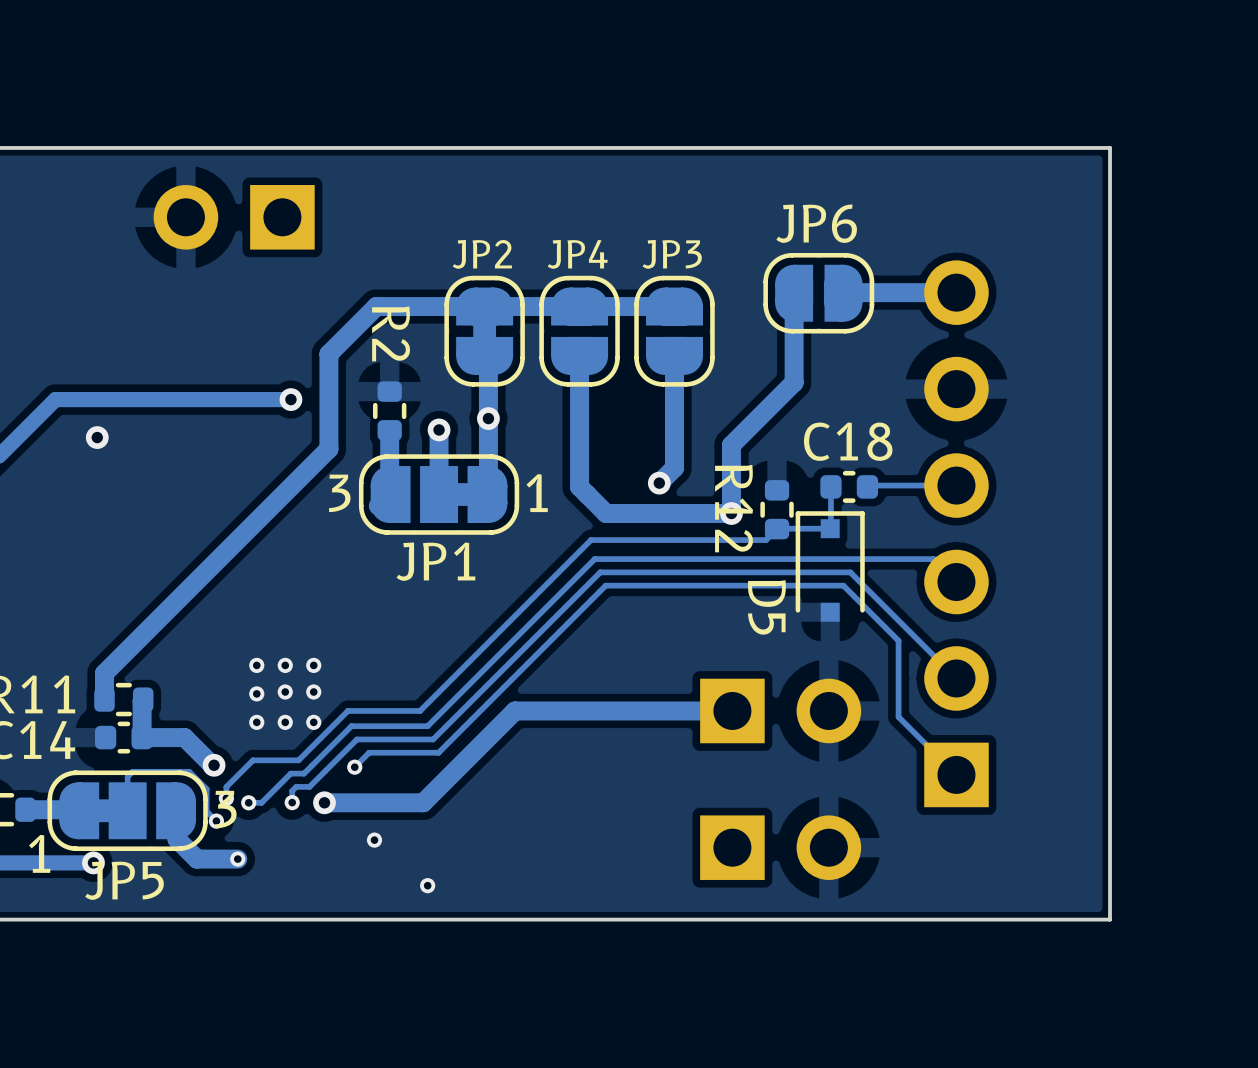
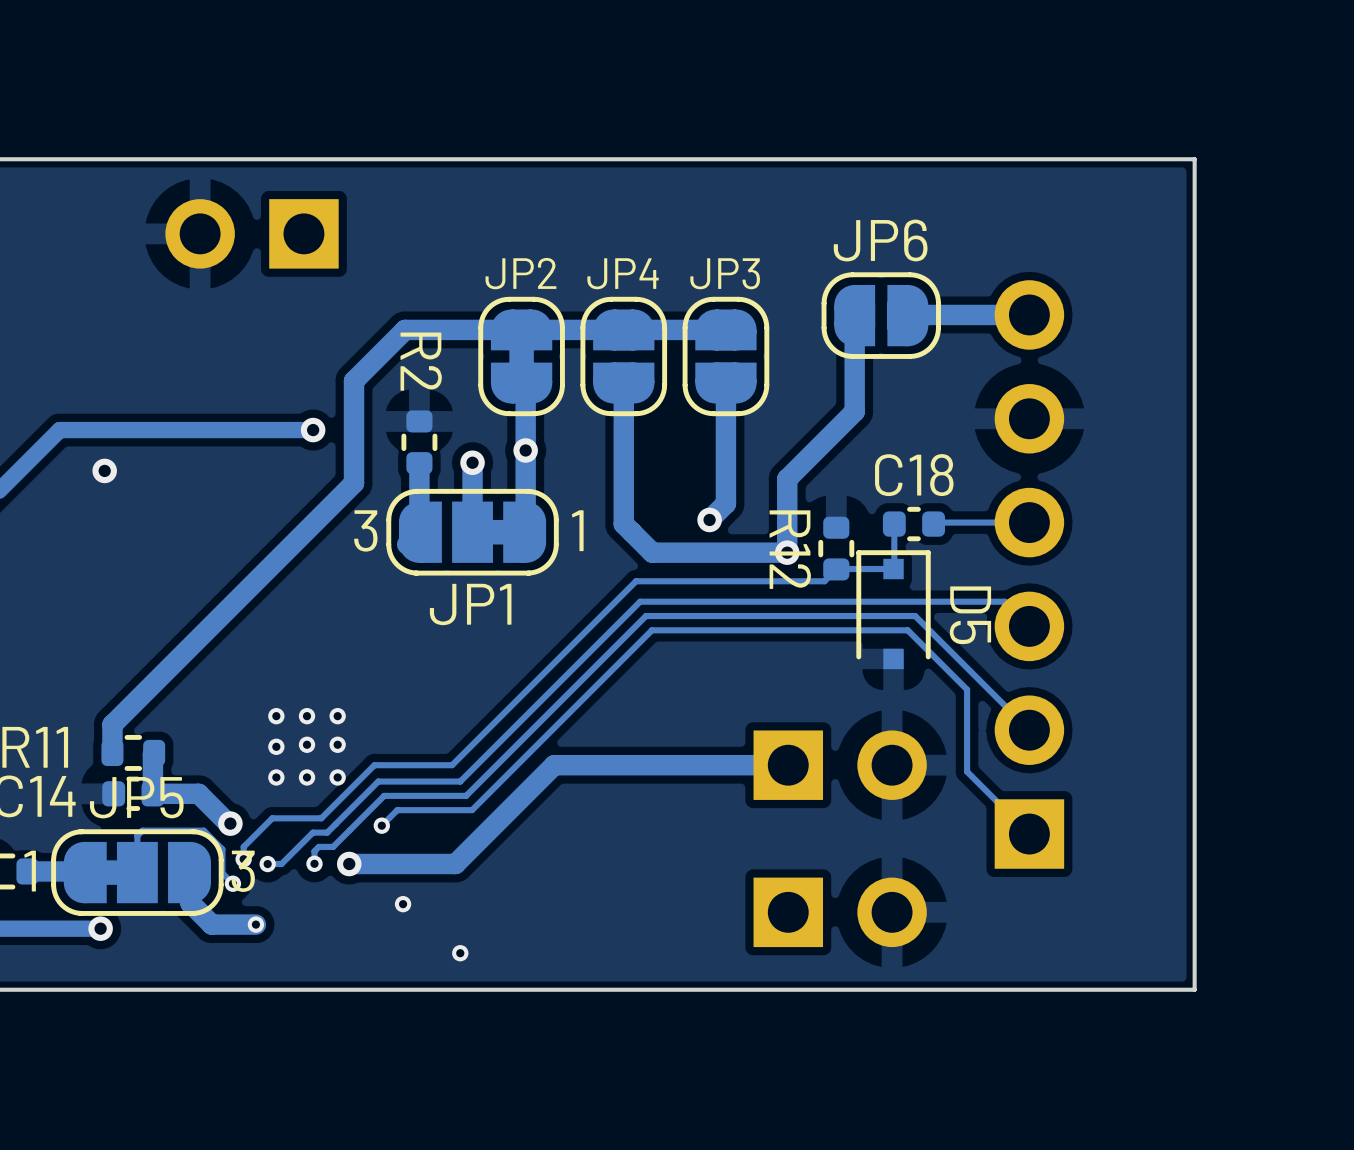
D5 name position: D5 (766, 607) -> D5 (970, 615)
JP5 text position: 1 (39, 853) -> 1 (30, 871)
JP5 name position: JP5 (124, 880) -> JP5 (136, 797)

